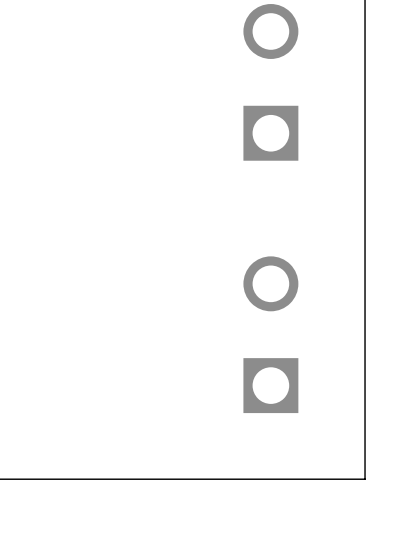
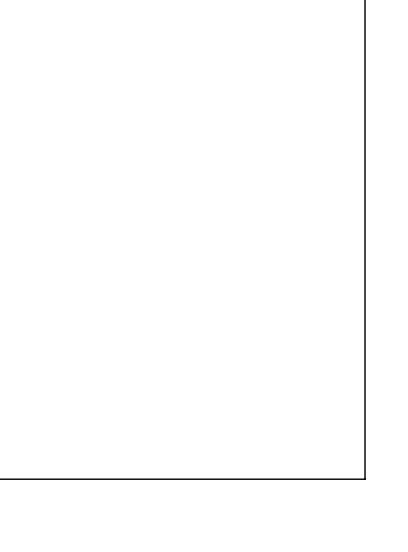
part: (270, 82) -> none
part: (270, 334) -> none

